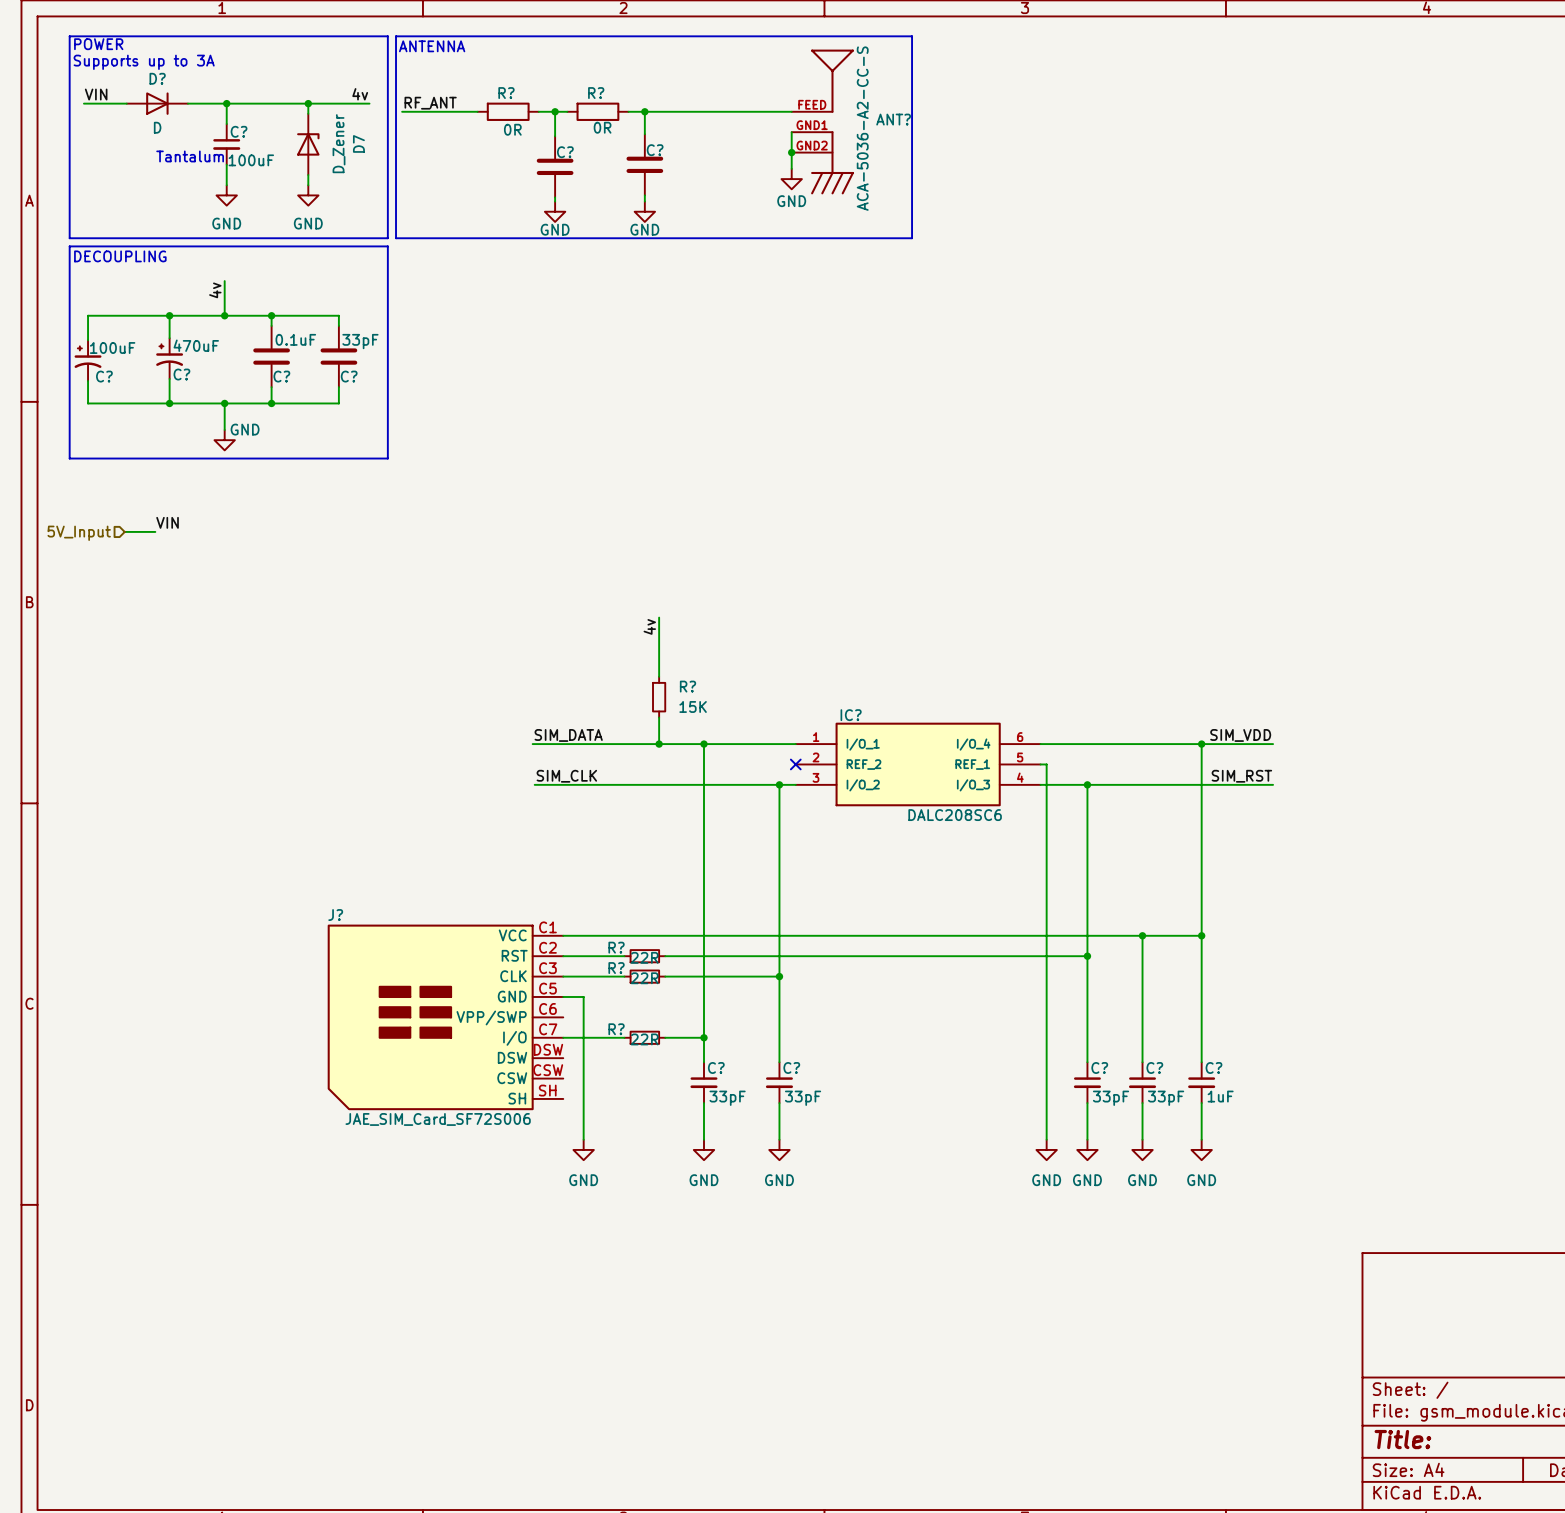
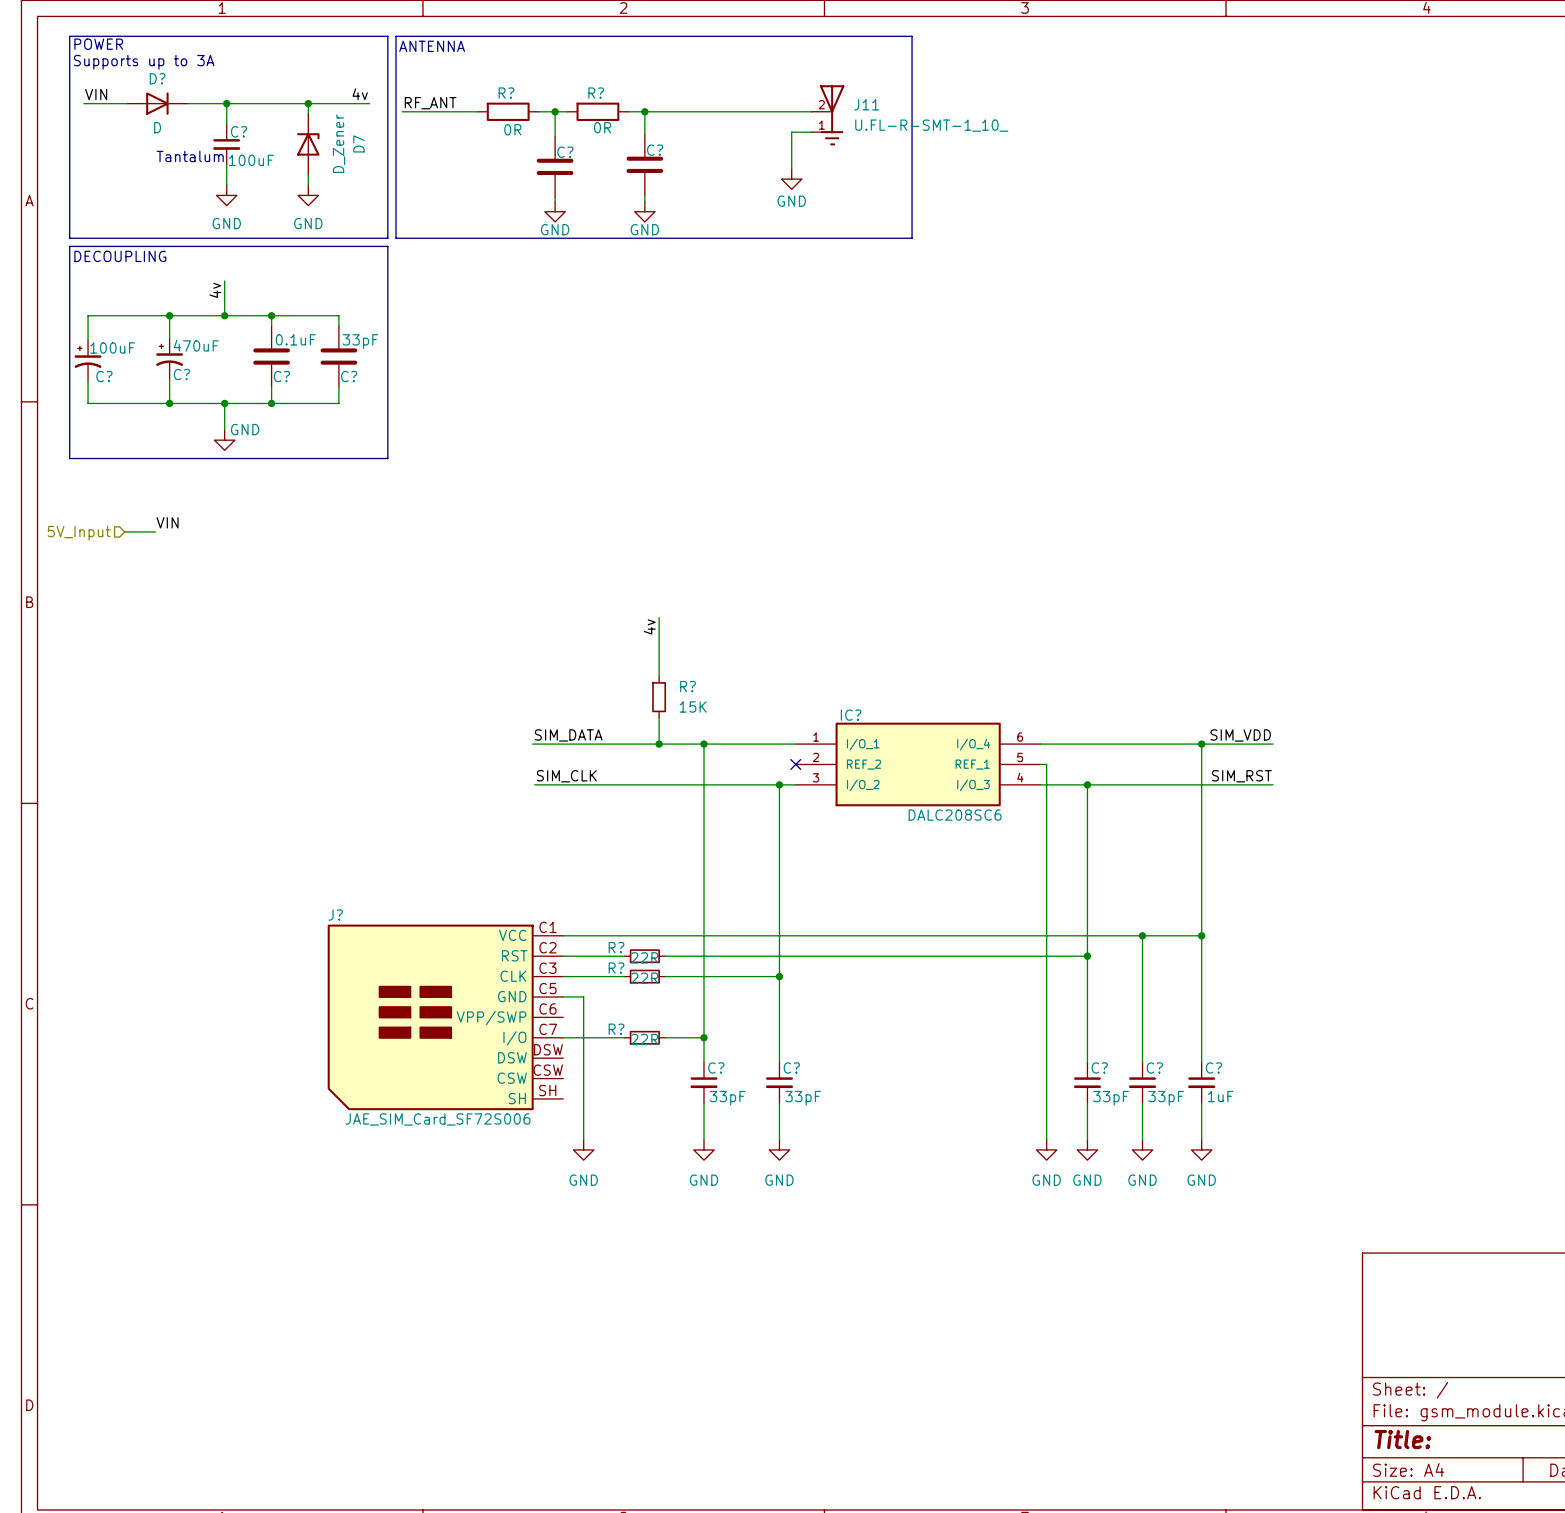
J11: none -> U.FL-R-SMT-1_10_ (828, 115)
ANT?: ACA-5036-A2-CC-S (822, 121) -> none
junction: (791, 152) -> none

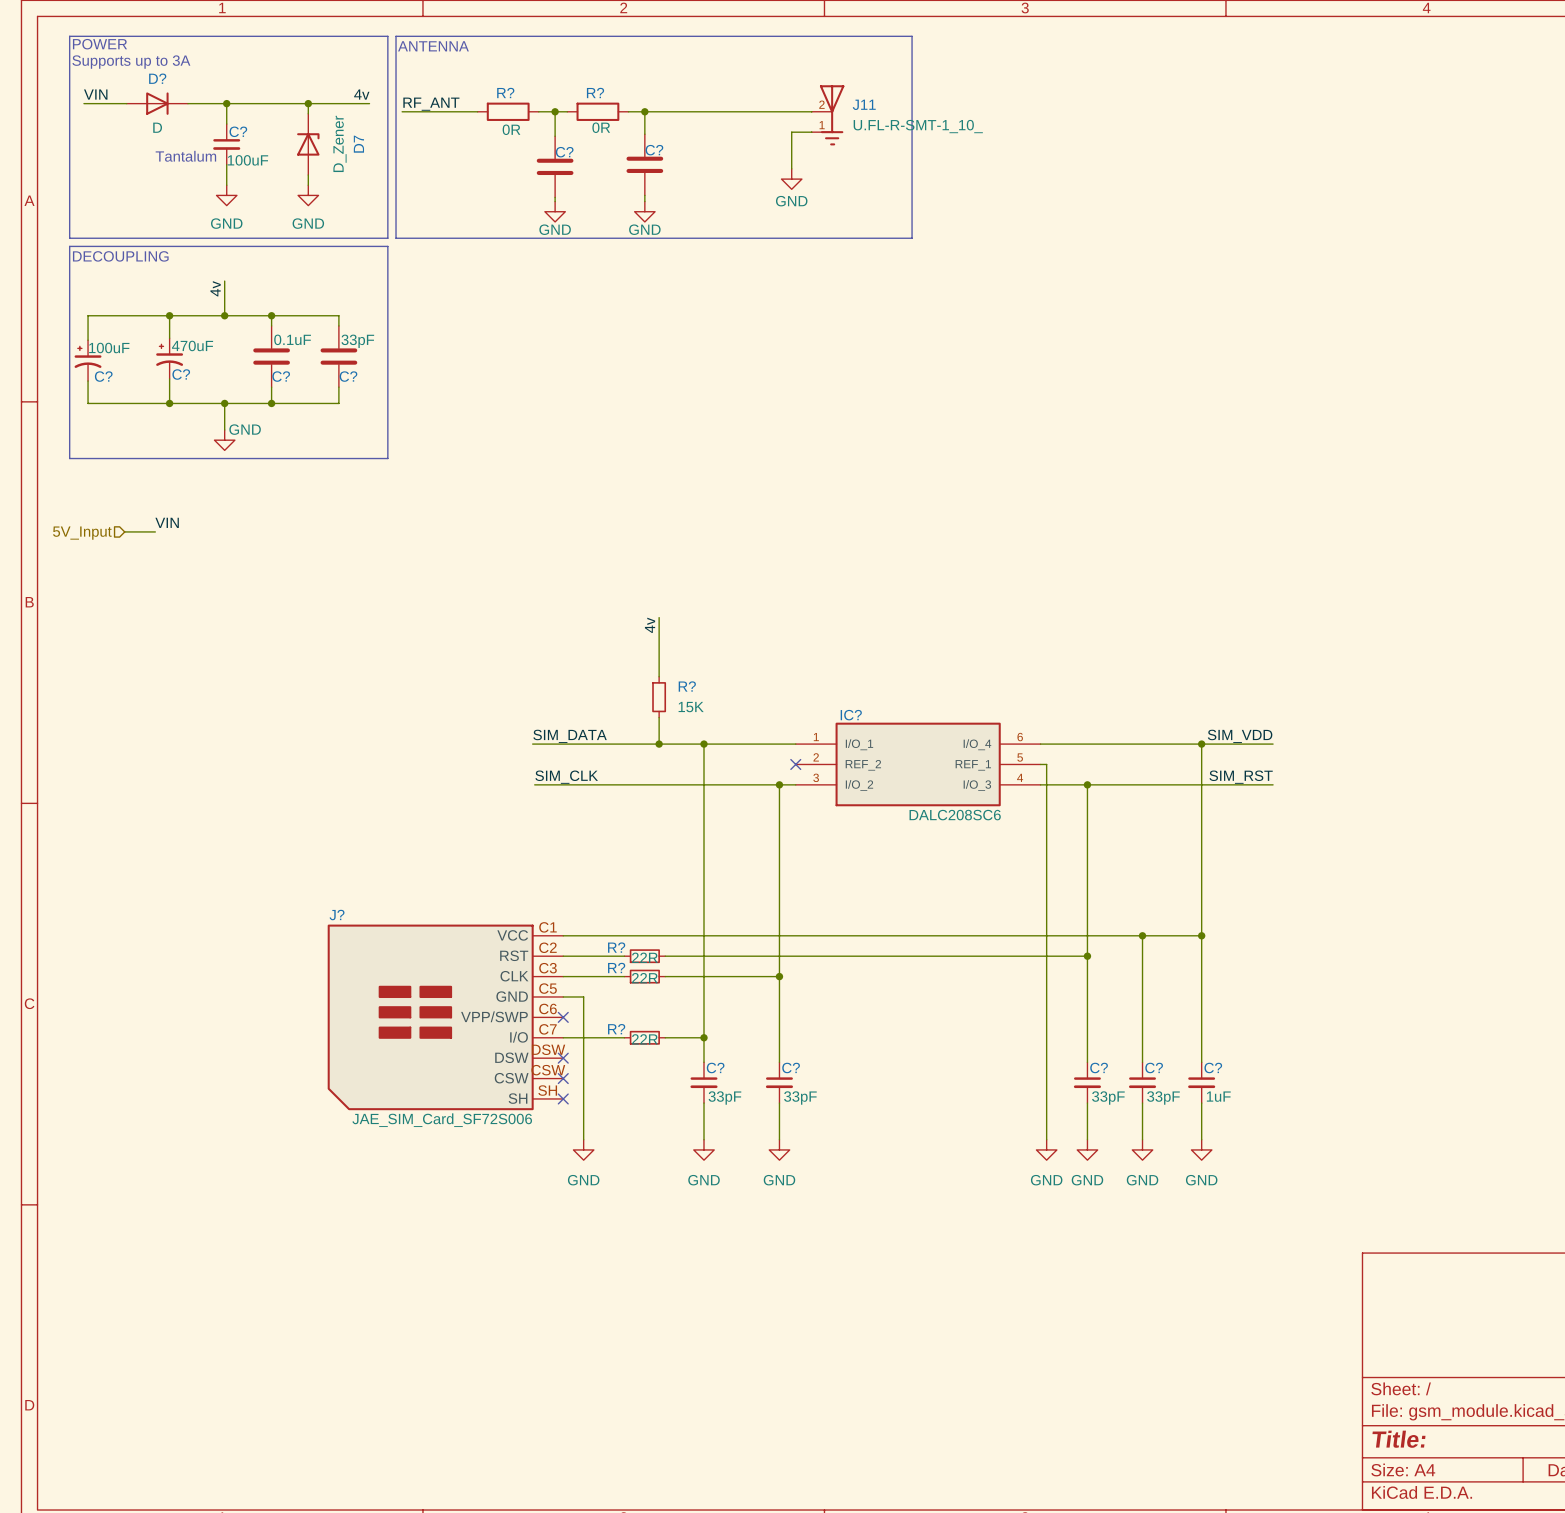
no-connect mark: none -> (563, 1017)
no-connect mark: none -> (563, 1058)
no-connect mark: none -> (563, 1078)
no-connect mark: none -> (563, 1098)

